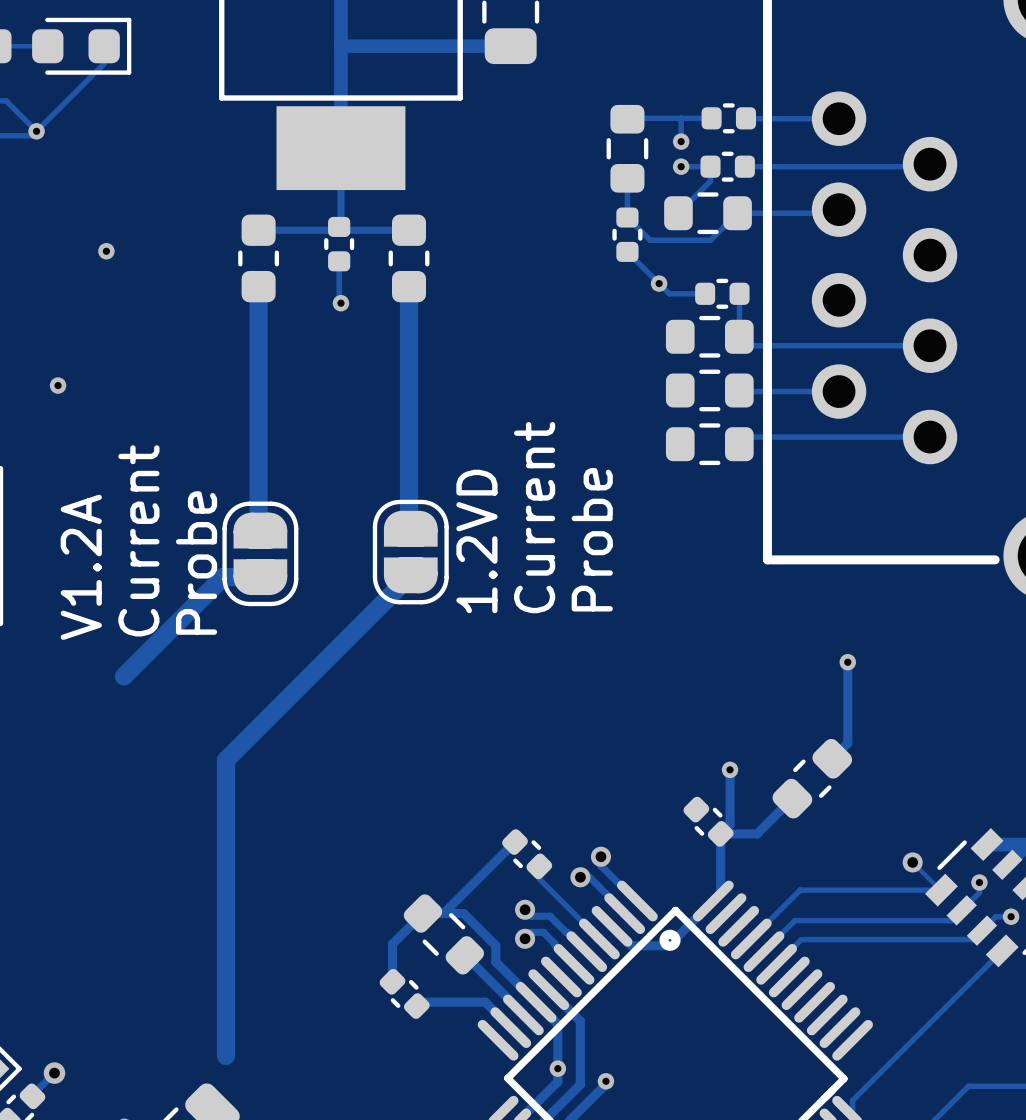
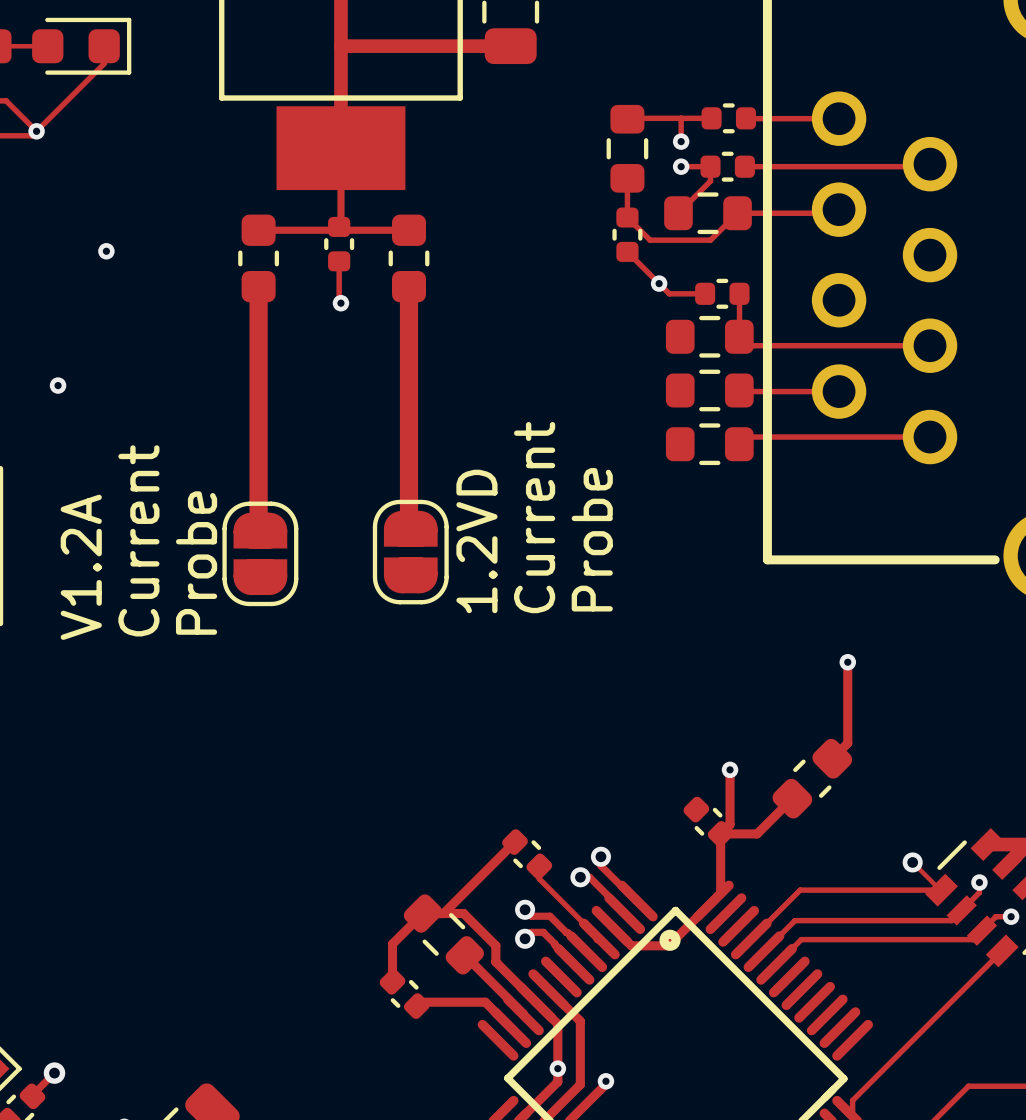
track: (410, 575) (226, 760) (226, 1055) -> none
track: (260, 577) (223, 577) (123, 676) -> none

